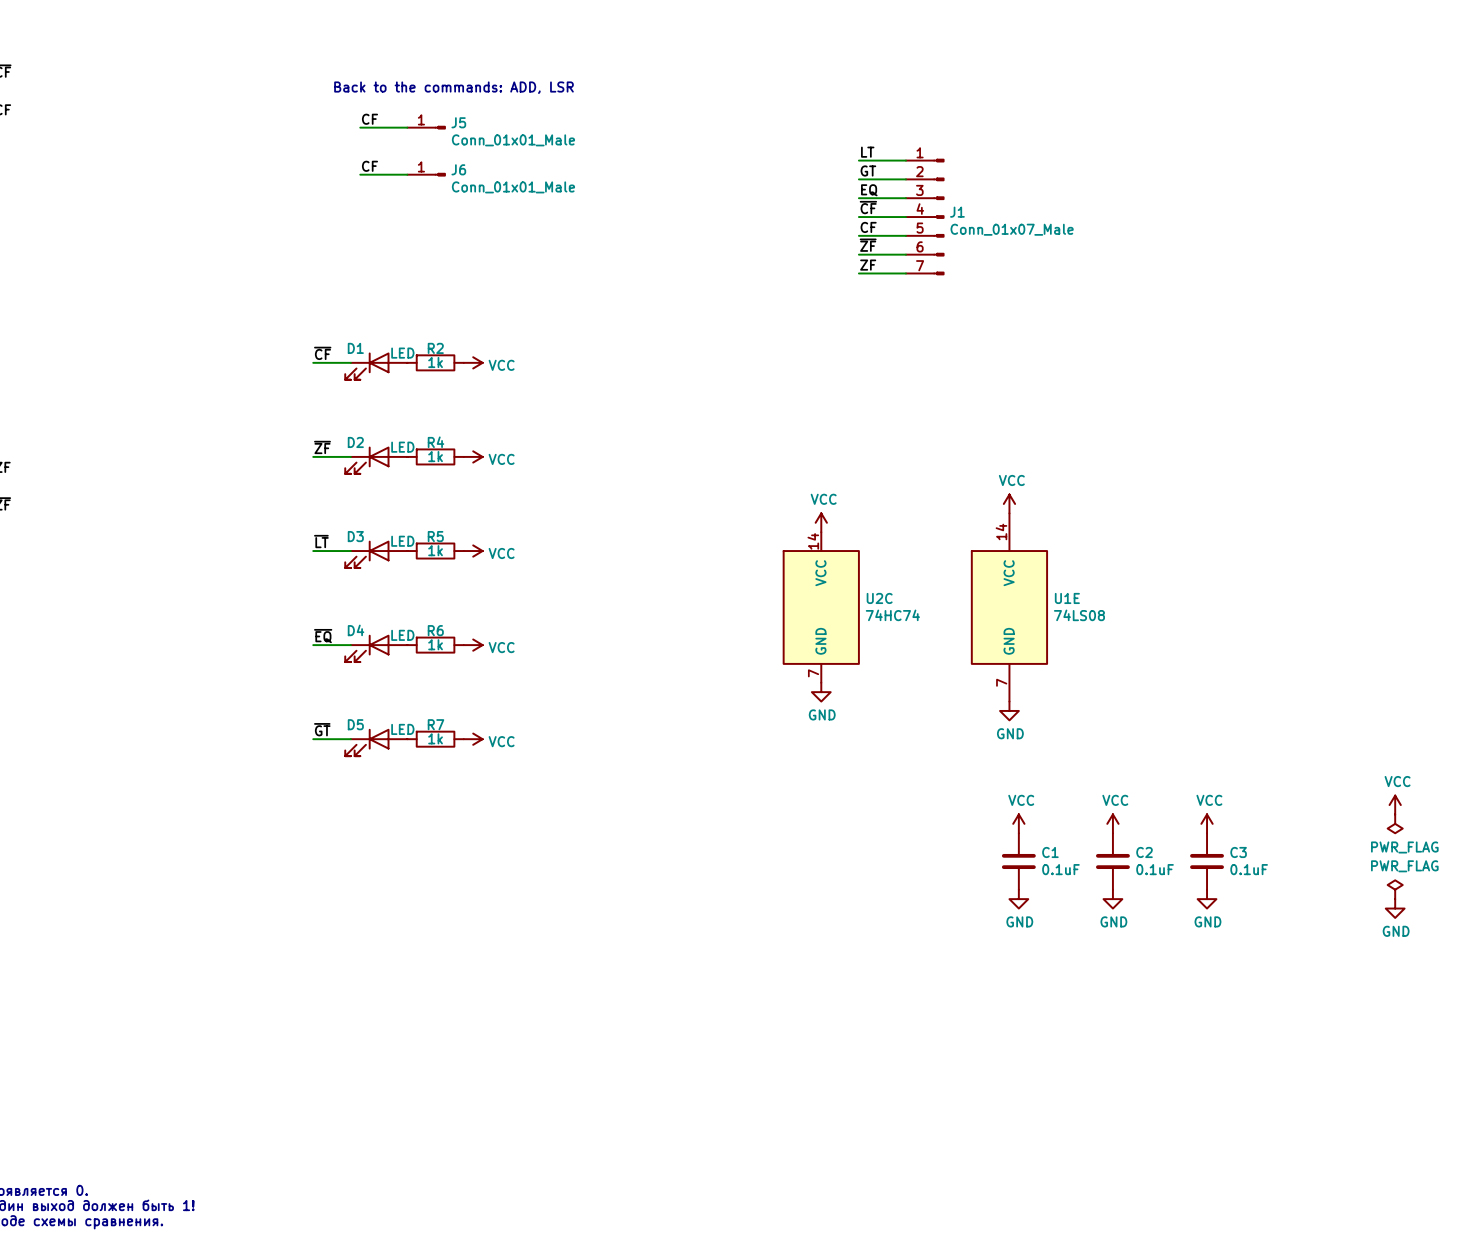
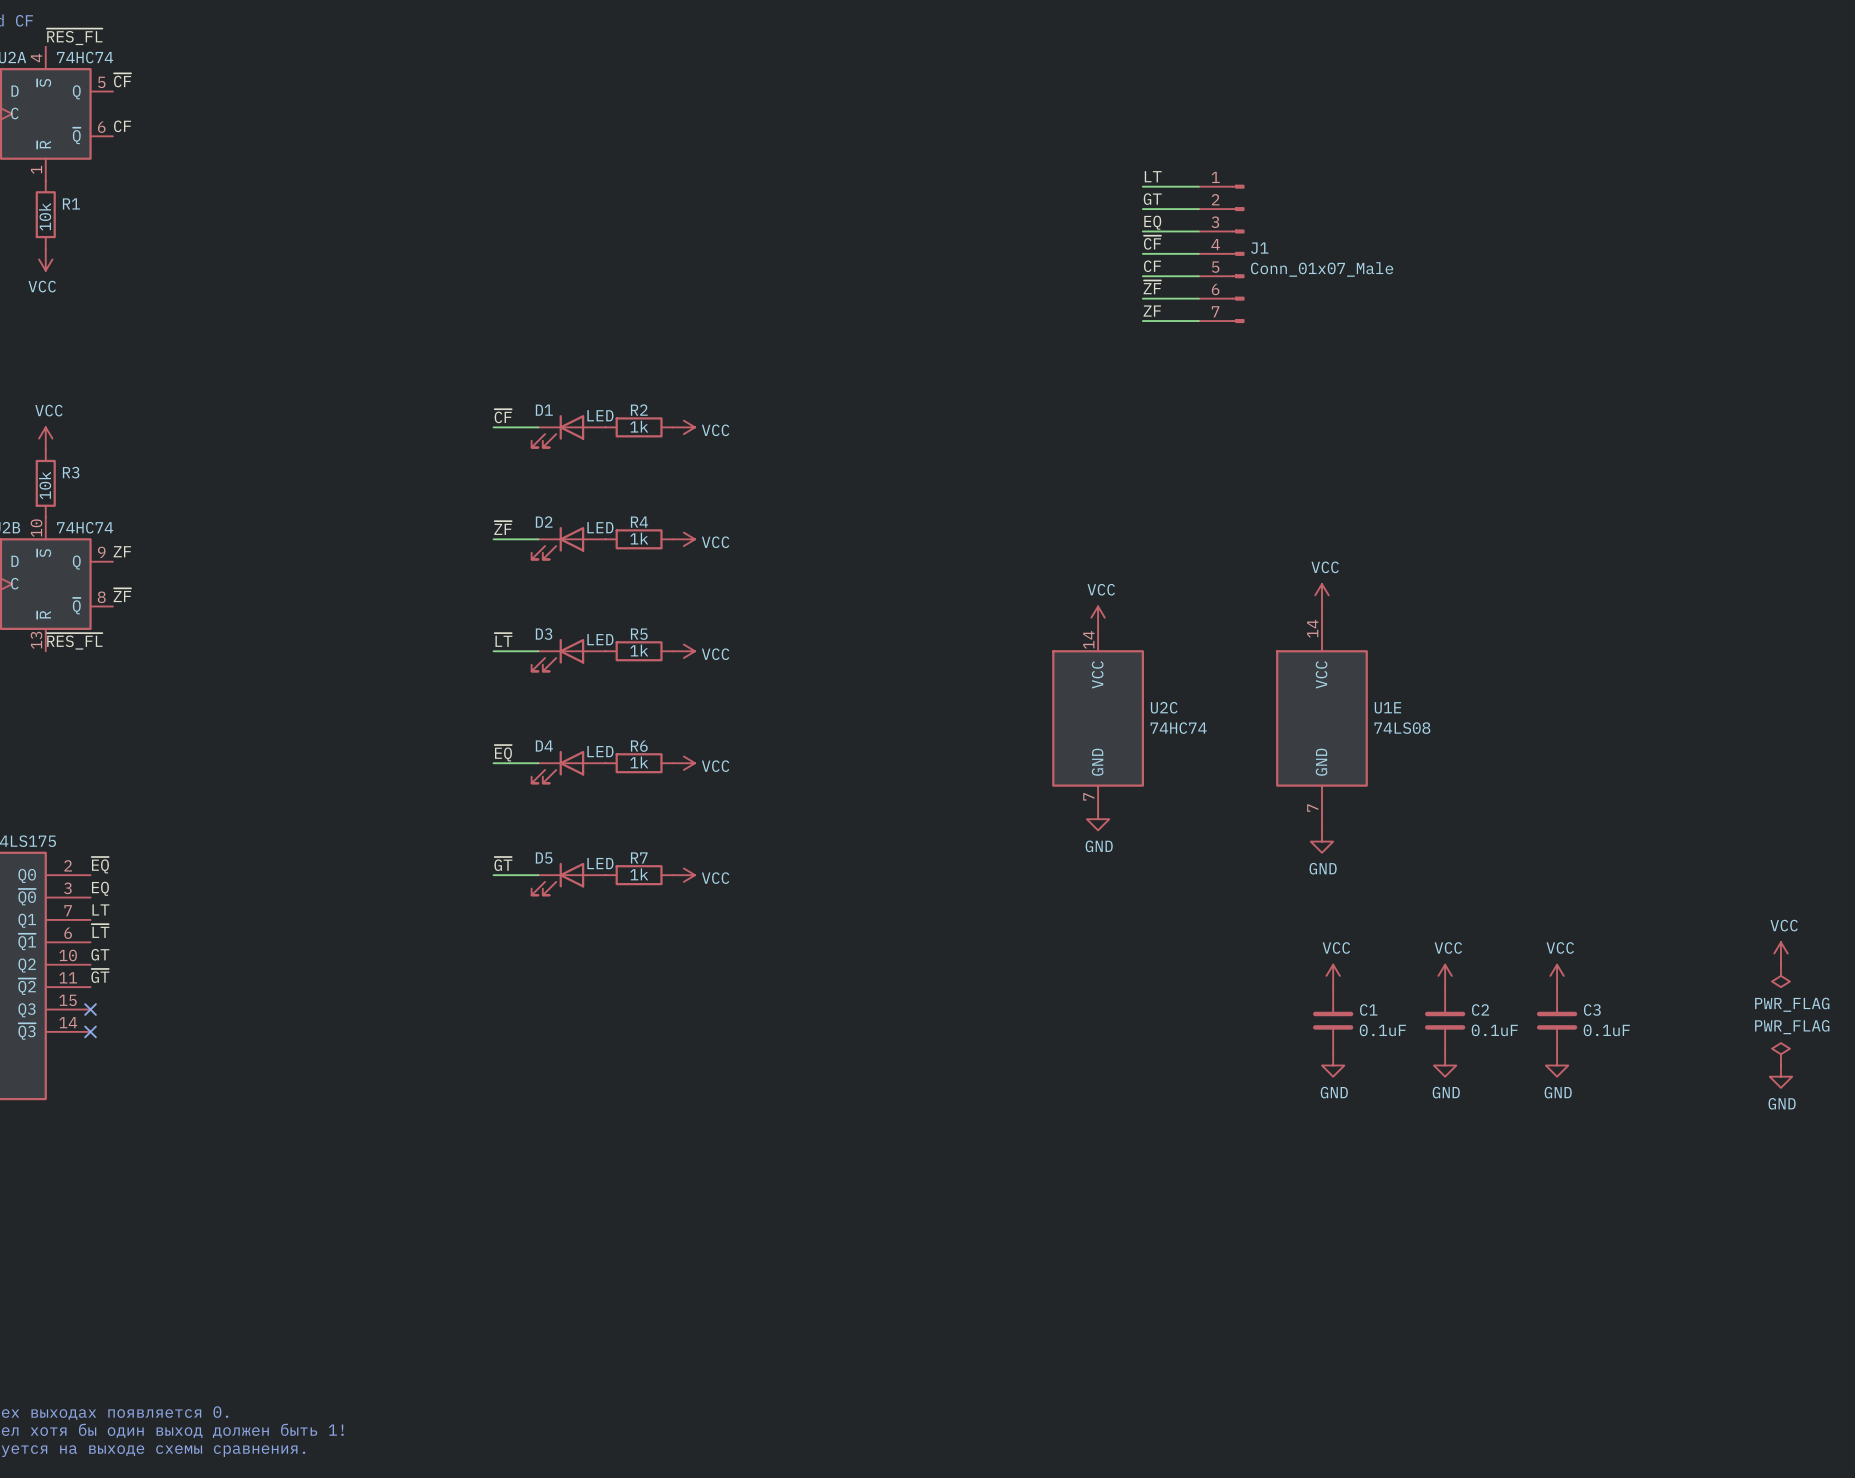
text: Back to the commands: ADD, LSR (453, 87) -> none
label: CF (369, 119) -> none
wire: (360, 127) (407, 127) -> none
J5: Conn_01x01_Male (426, 127) -> none
label: CF (369, 166) -> none
wire: (360, 174) (407, 174) -> none
J6: Conn_01x01_Male (426, 174) -> none

